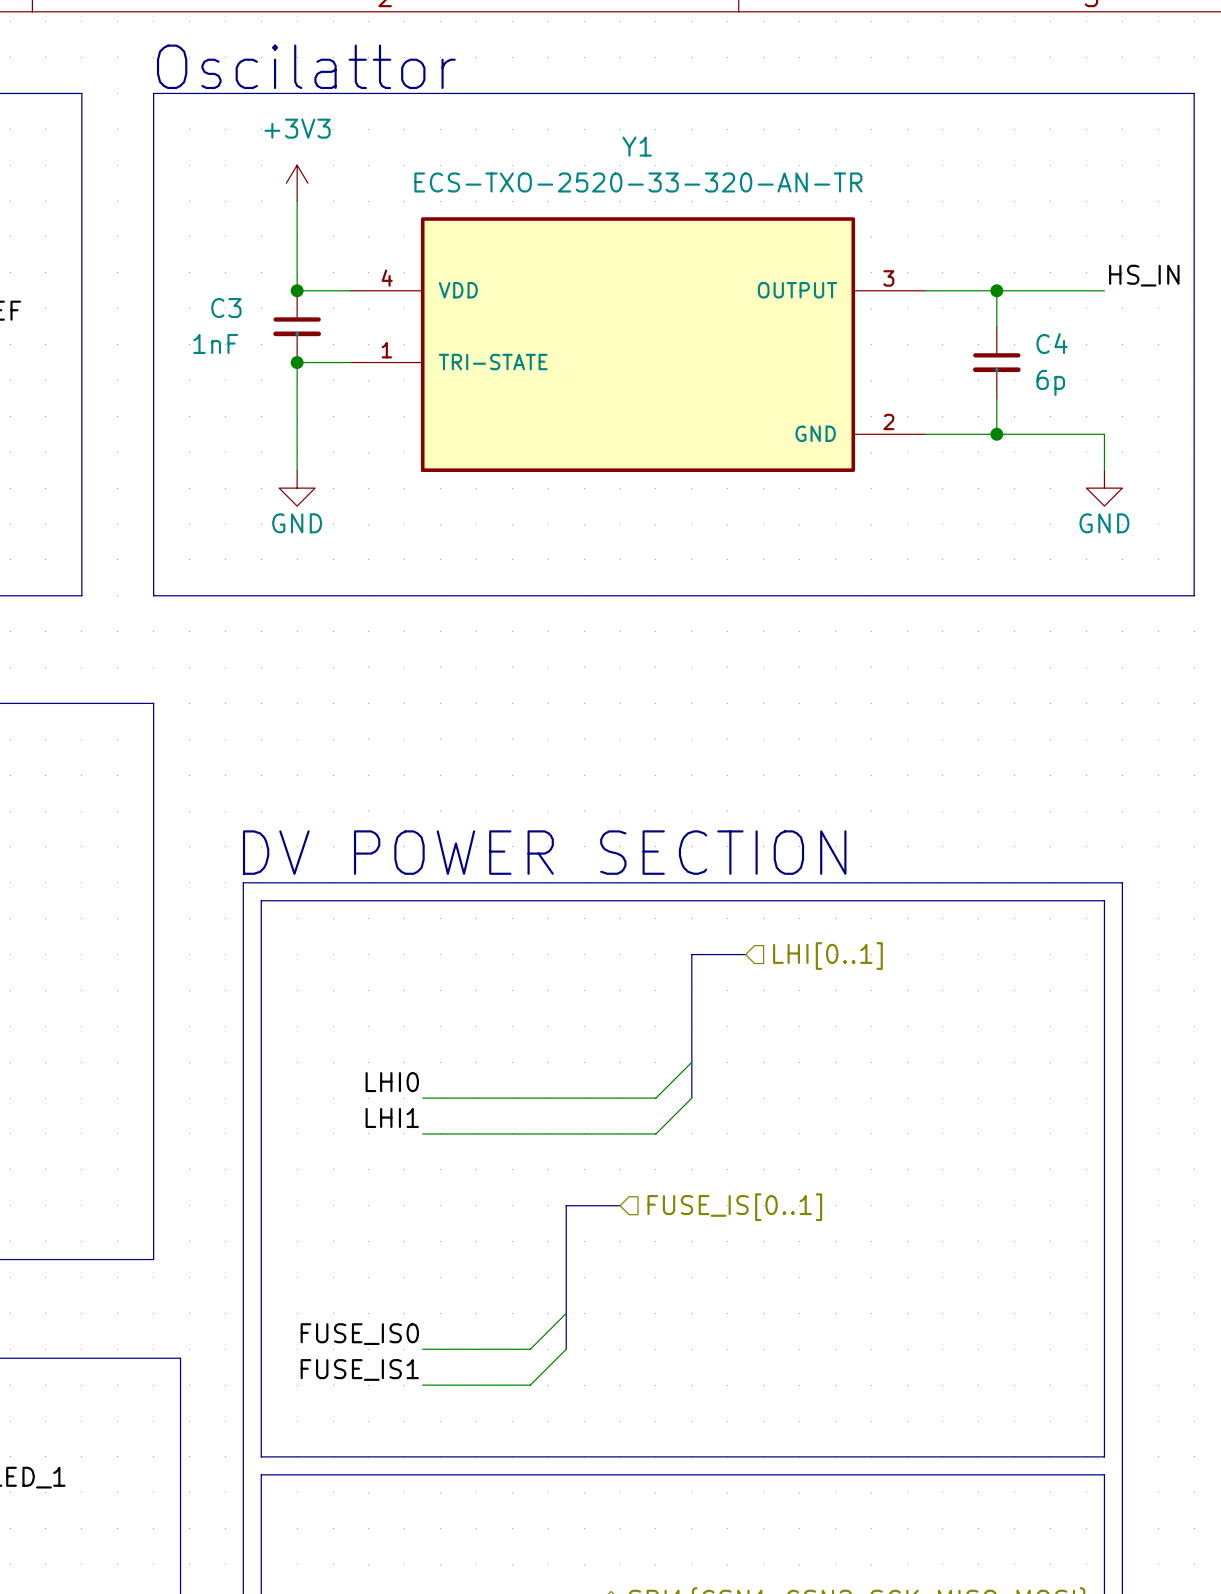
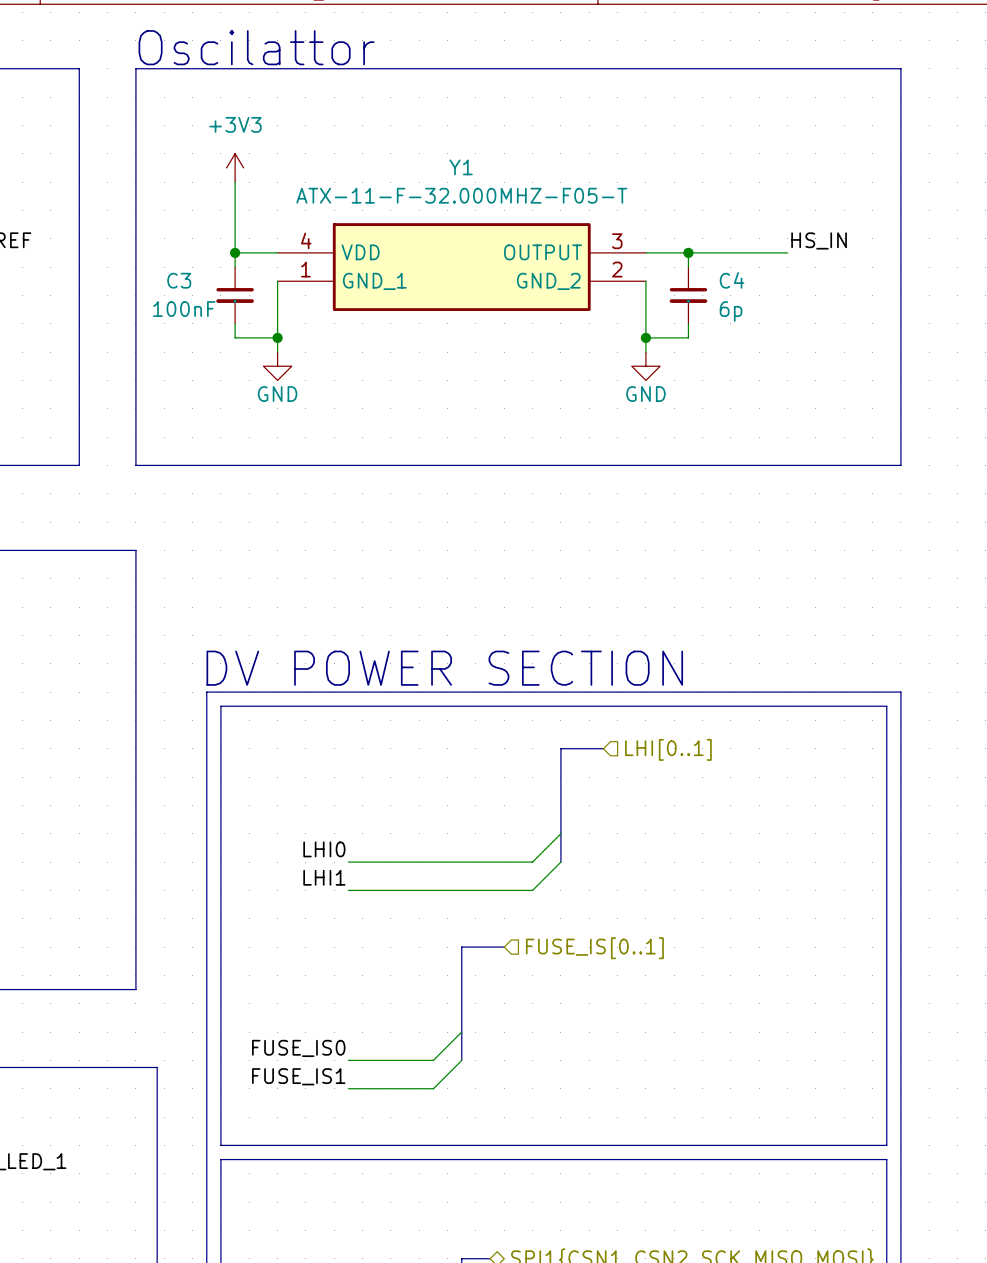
line: (1122, 93) (1194, 93) (1194, 595) (1122, 595) -> (900, 68) (900, 465)
Y1 name position: Y1 (637, 146) -> Y1 (461, 167)
Y1 value: ECS-TXO-2520-33-320-AN-TR (638, 182) -> ATX-11-F-32.000MHZ-F05-T (461, 195)
power symbol position: +3V3 (297, 183) -> +3V3 (235, 167)
wire: (297, 201) (297, 290) (350, 290) -> none
Y1 symbol: [350, 217, 926, 472] -> [277, 223, 646, 311]
wire: none -> (235, 182) (235, 267)
label position: HS_IN (1144, 275) -> HS_IN (819, 240)
junction: (297, 290) -> none
wire: (925, 290) (1104, 290) -> (645, 252) (787, 252)
wire: (996, 290) (996, 326) -> none
junction: (996, 290) -> none
wire: none -> (235, 252) (277, 252)
junction: none -> (235, 252)
C3 position: (297, 326) -> (235, 295)
junction: none -> (688, 252)
C3 value: 1nF (215, 343) -> 100nF (184, 309)
junction: (297, 362) -> none
wire: none -> (277, 281) (277, 352)
wire: (350, 362) (297, 362) (297, 470) -> none
C4 position: (996, 362) -> (688, 295)
wire: (996, 398) (996, 434) -> none
wire: none -> (235, 323) (235, 337) (277, 337)
junction: none -> (277, 337)
junction: none -> (645, 337)
wire: (925, 434) (1104, 434) (1104, 470) -> none
junction: (996, 434) -> none
power symbol: none -> GND (645, 366)
power symbol position: GND (297, 488) -> GND (277, 366)
power symbol: GND (1104, 488) -> none

